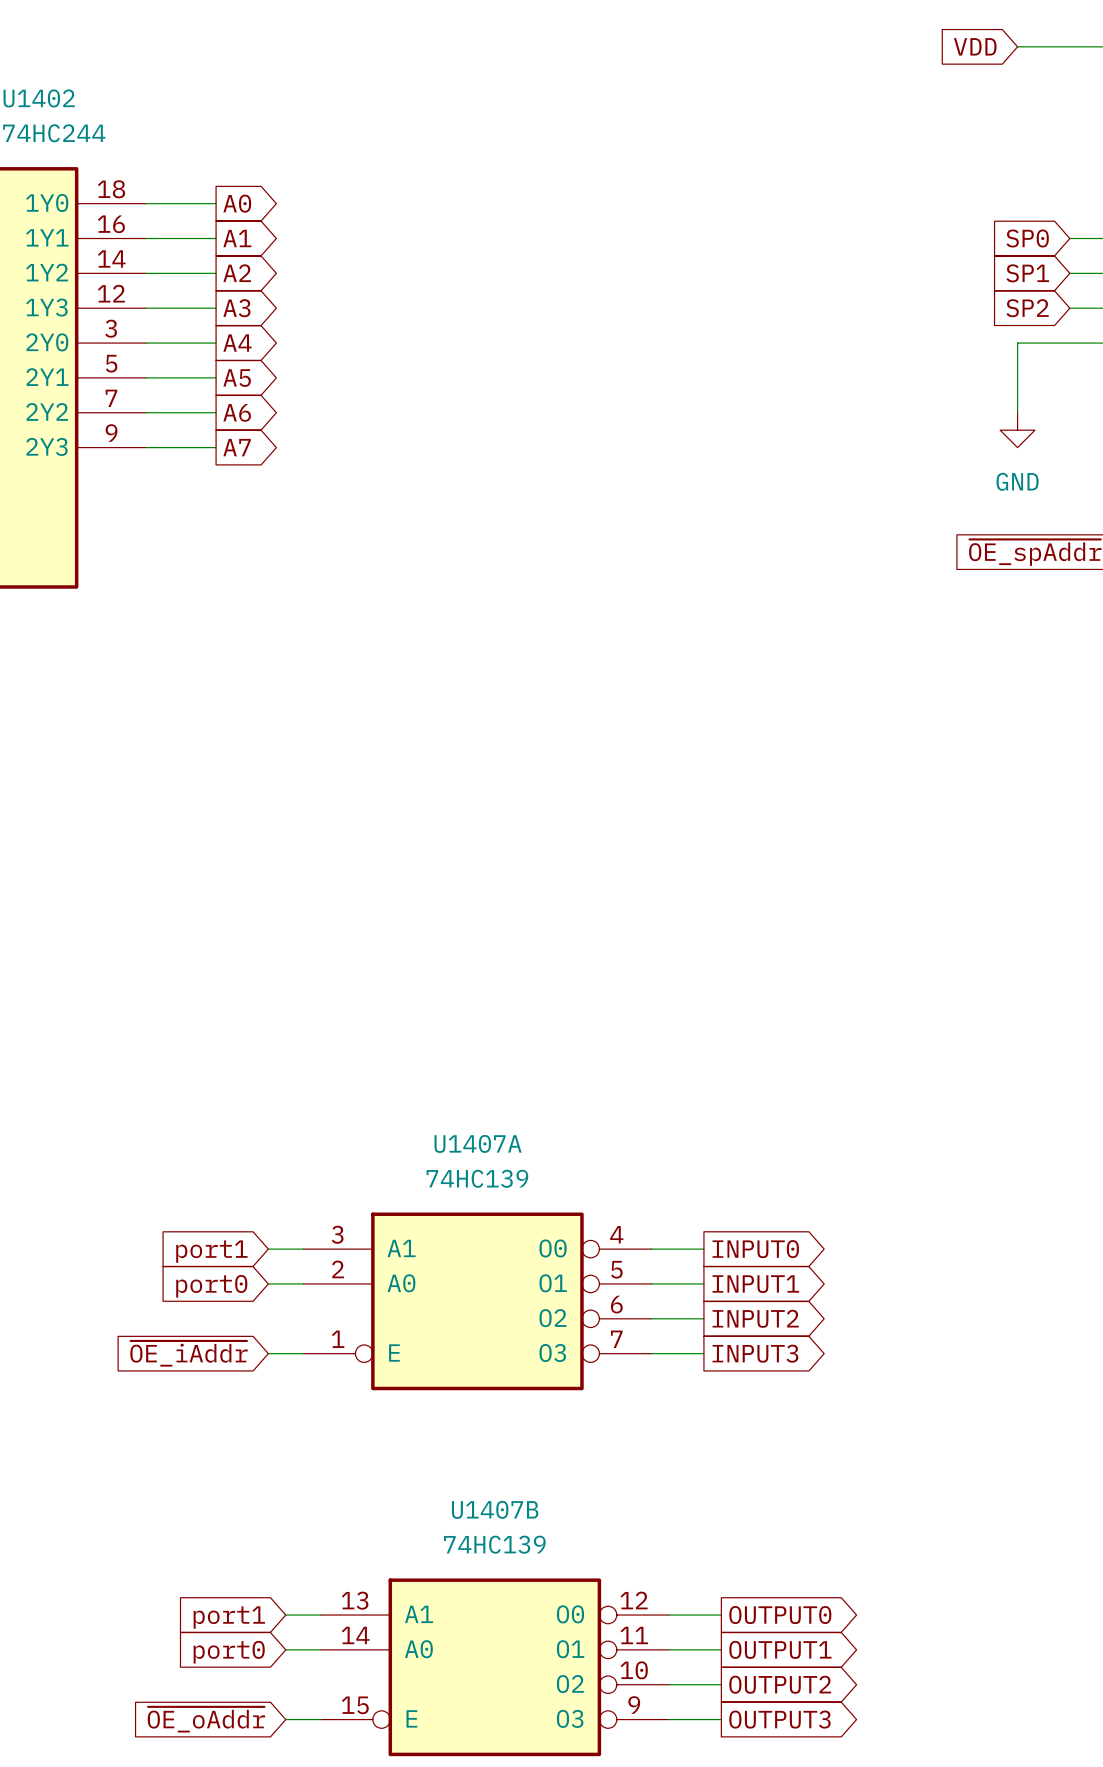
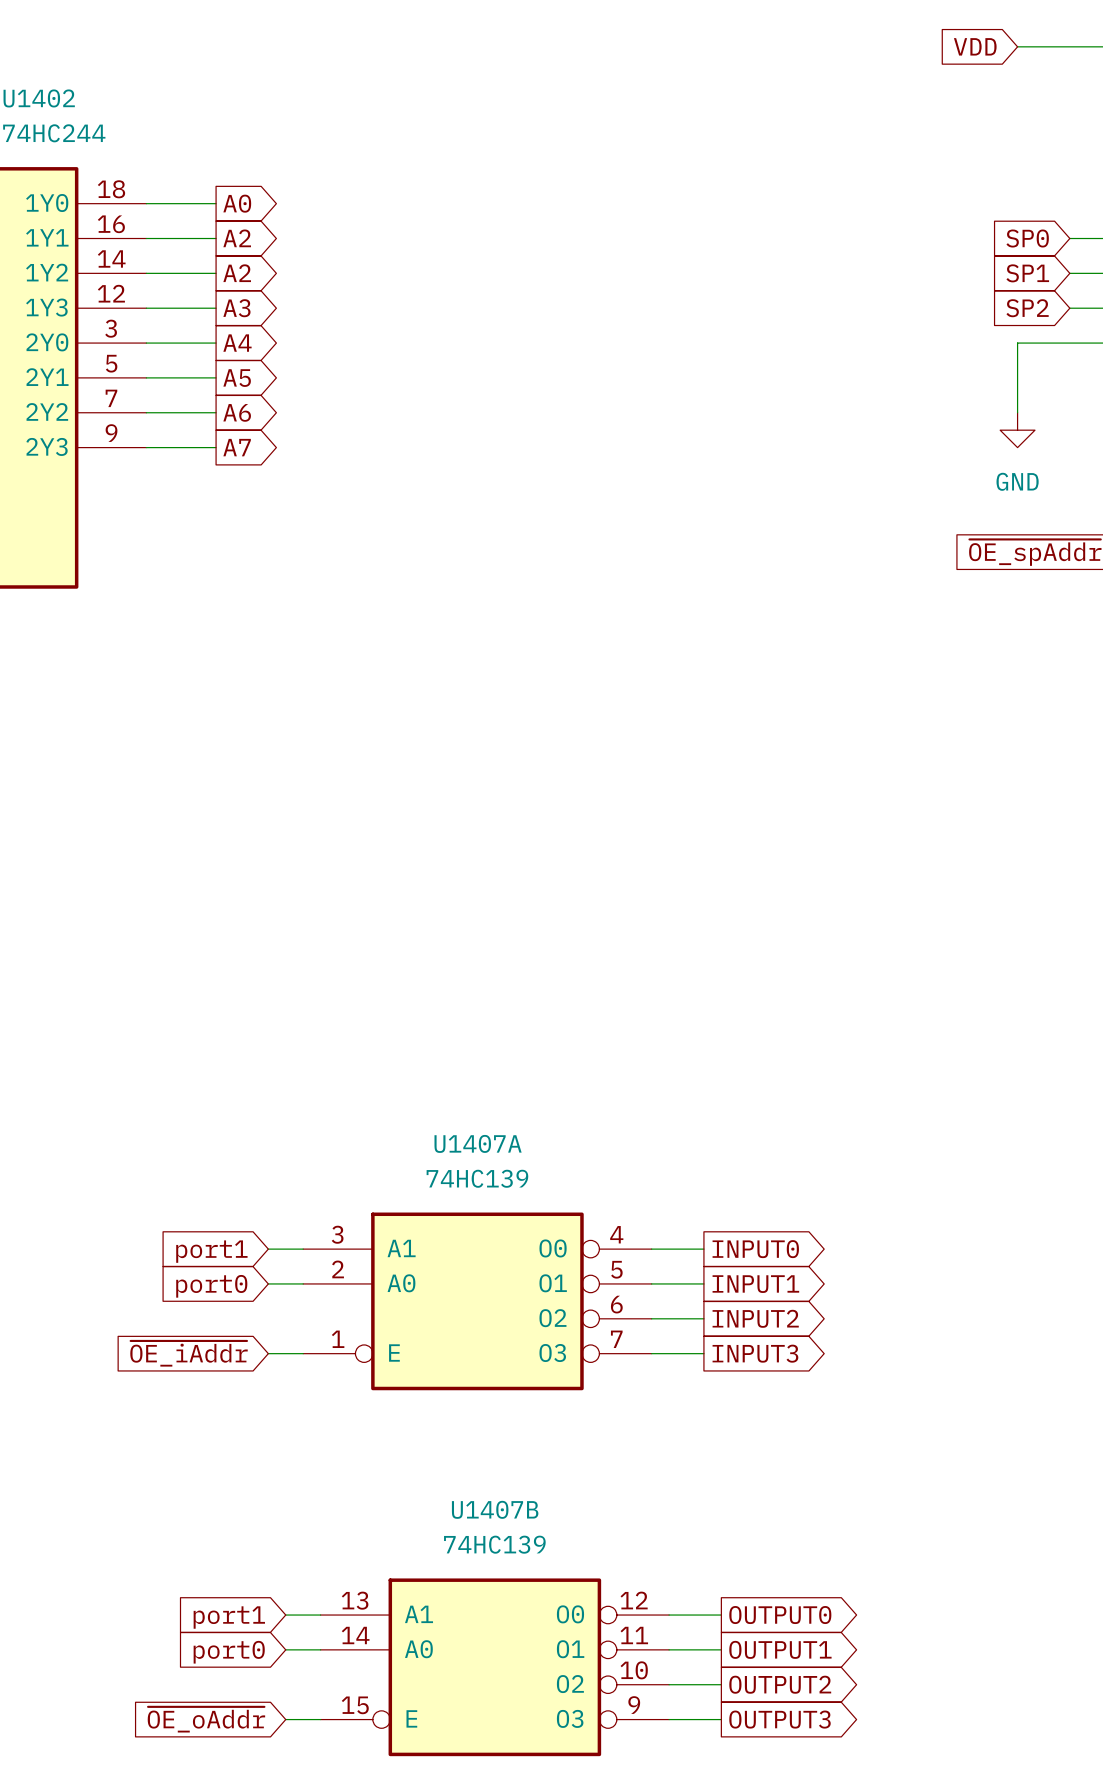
global label: A1 (237, 238) -> A2 (237, 238)

